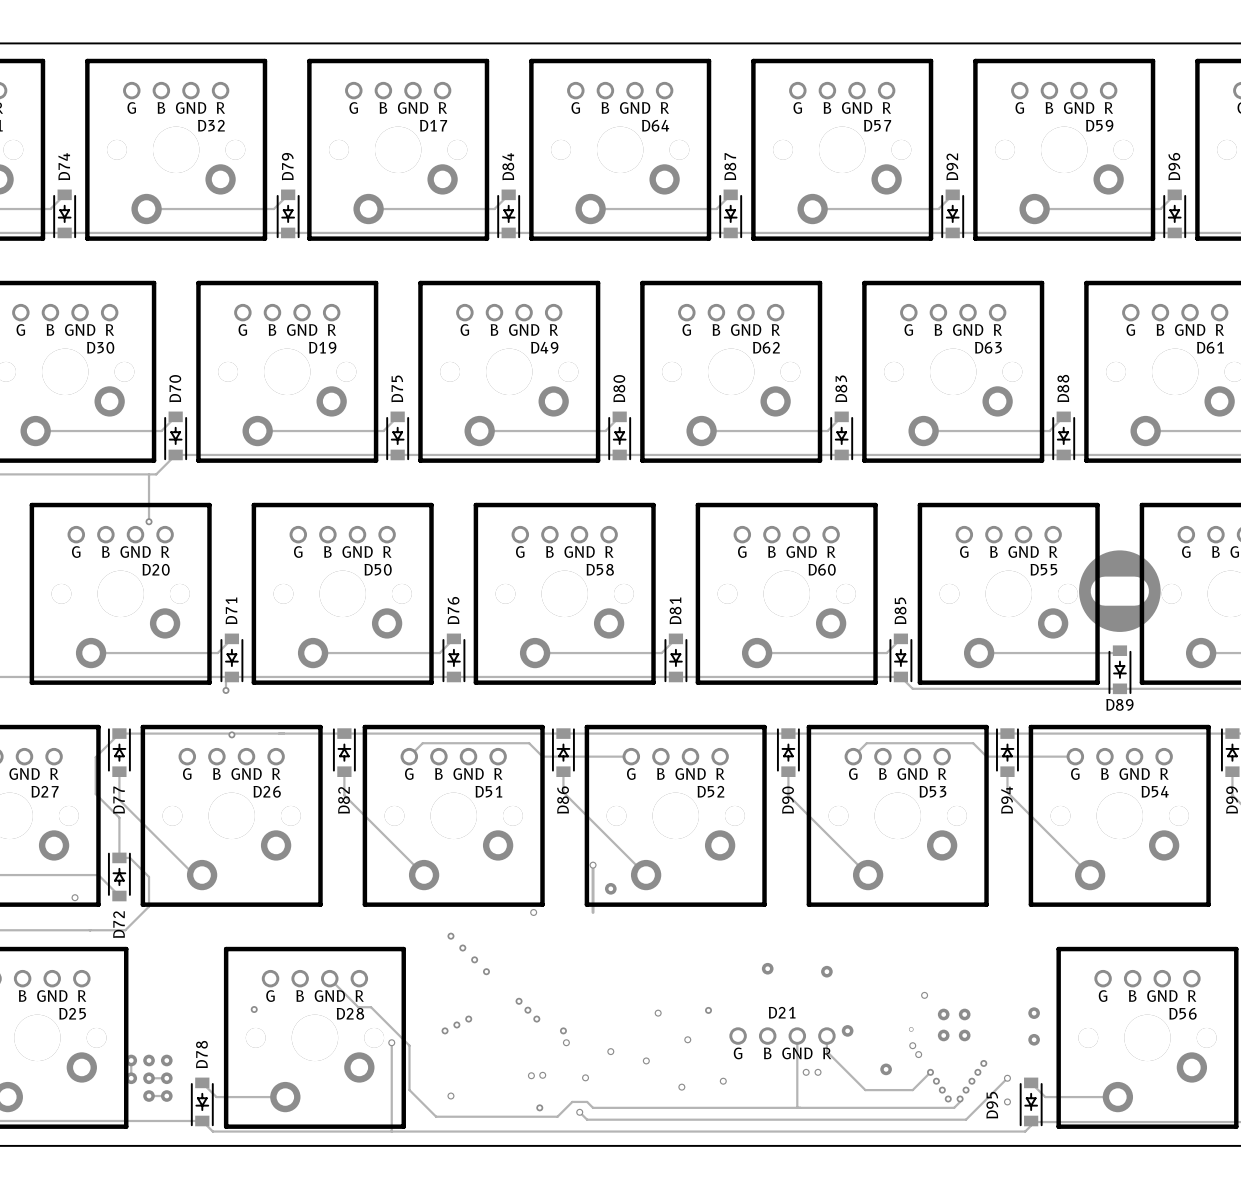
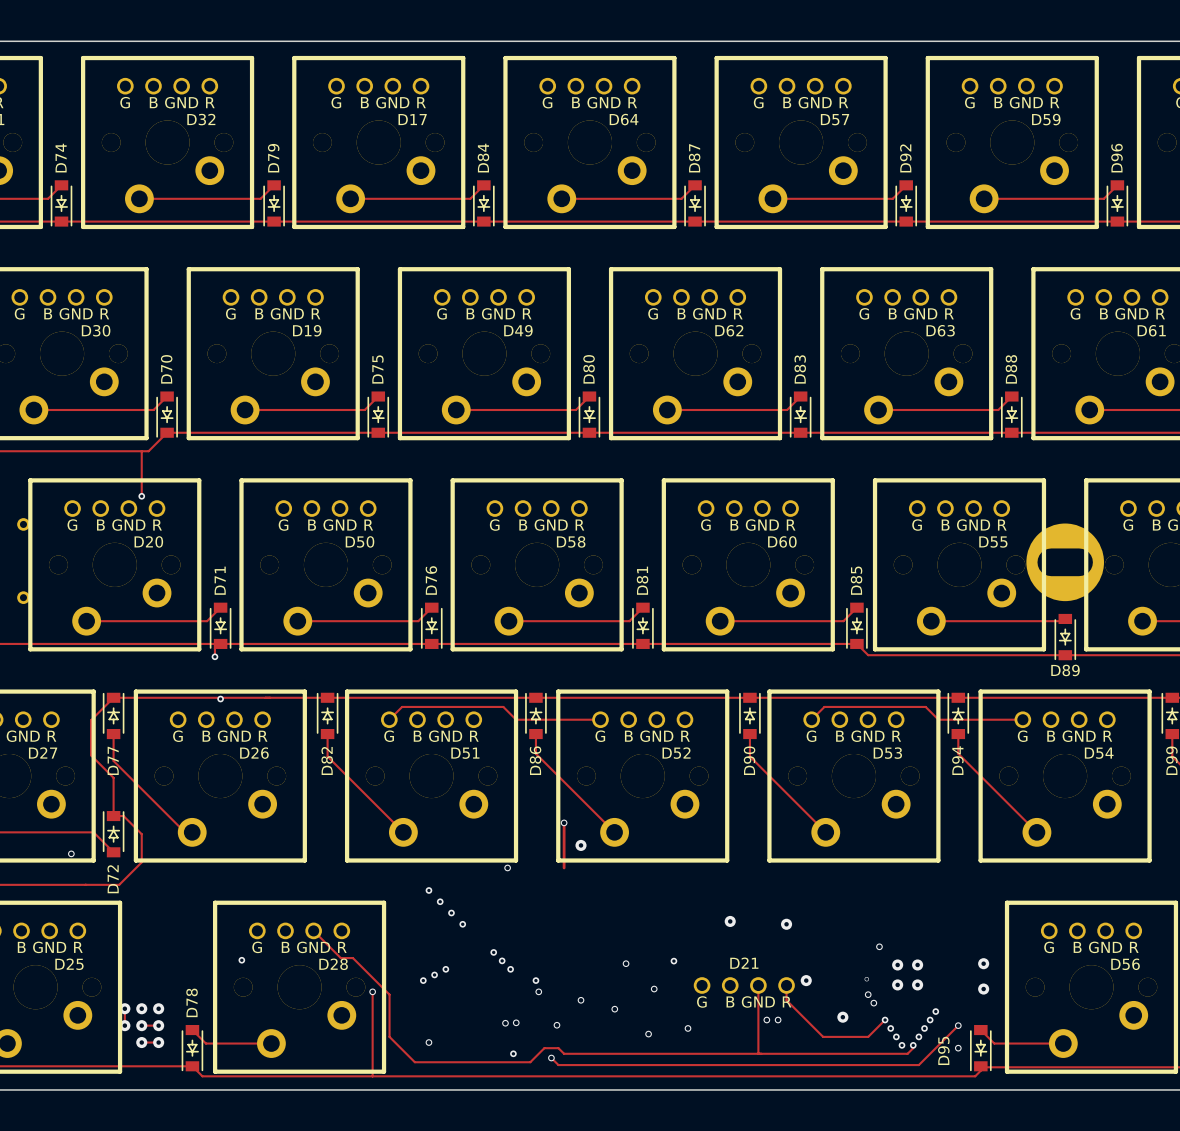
part: none -> (23, 524)
part: none -> (23, 597)

